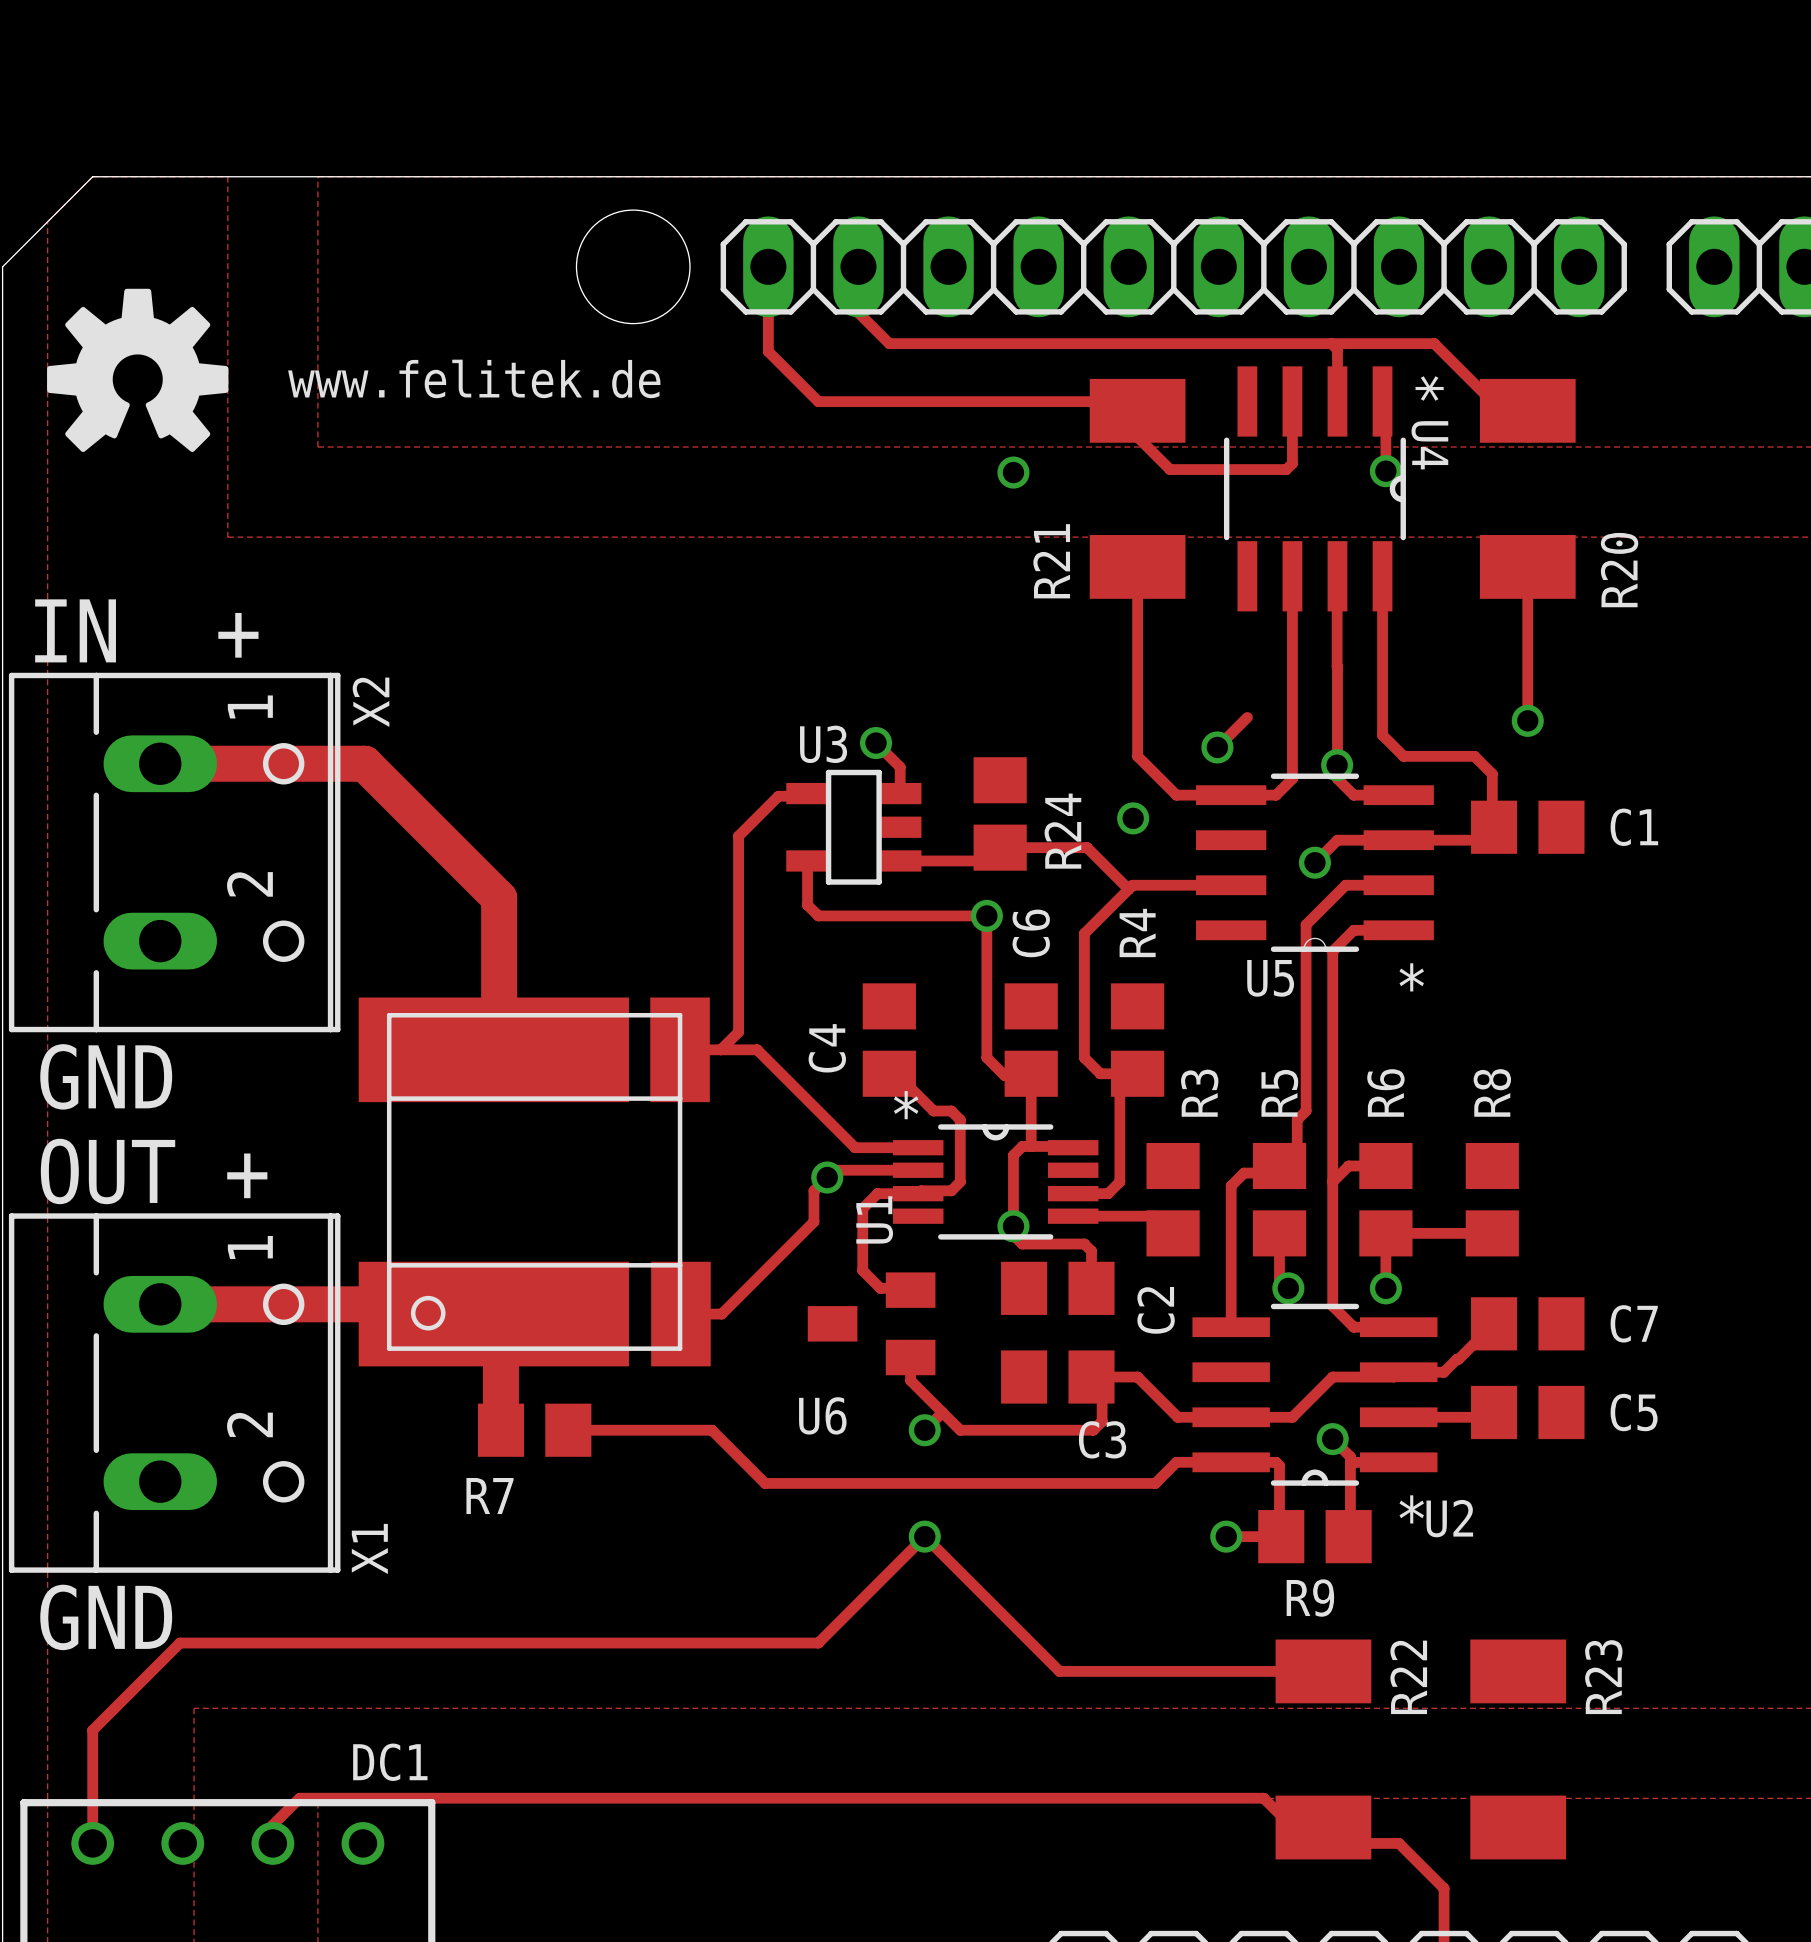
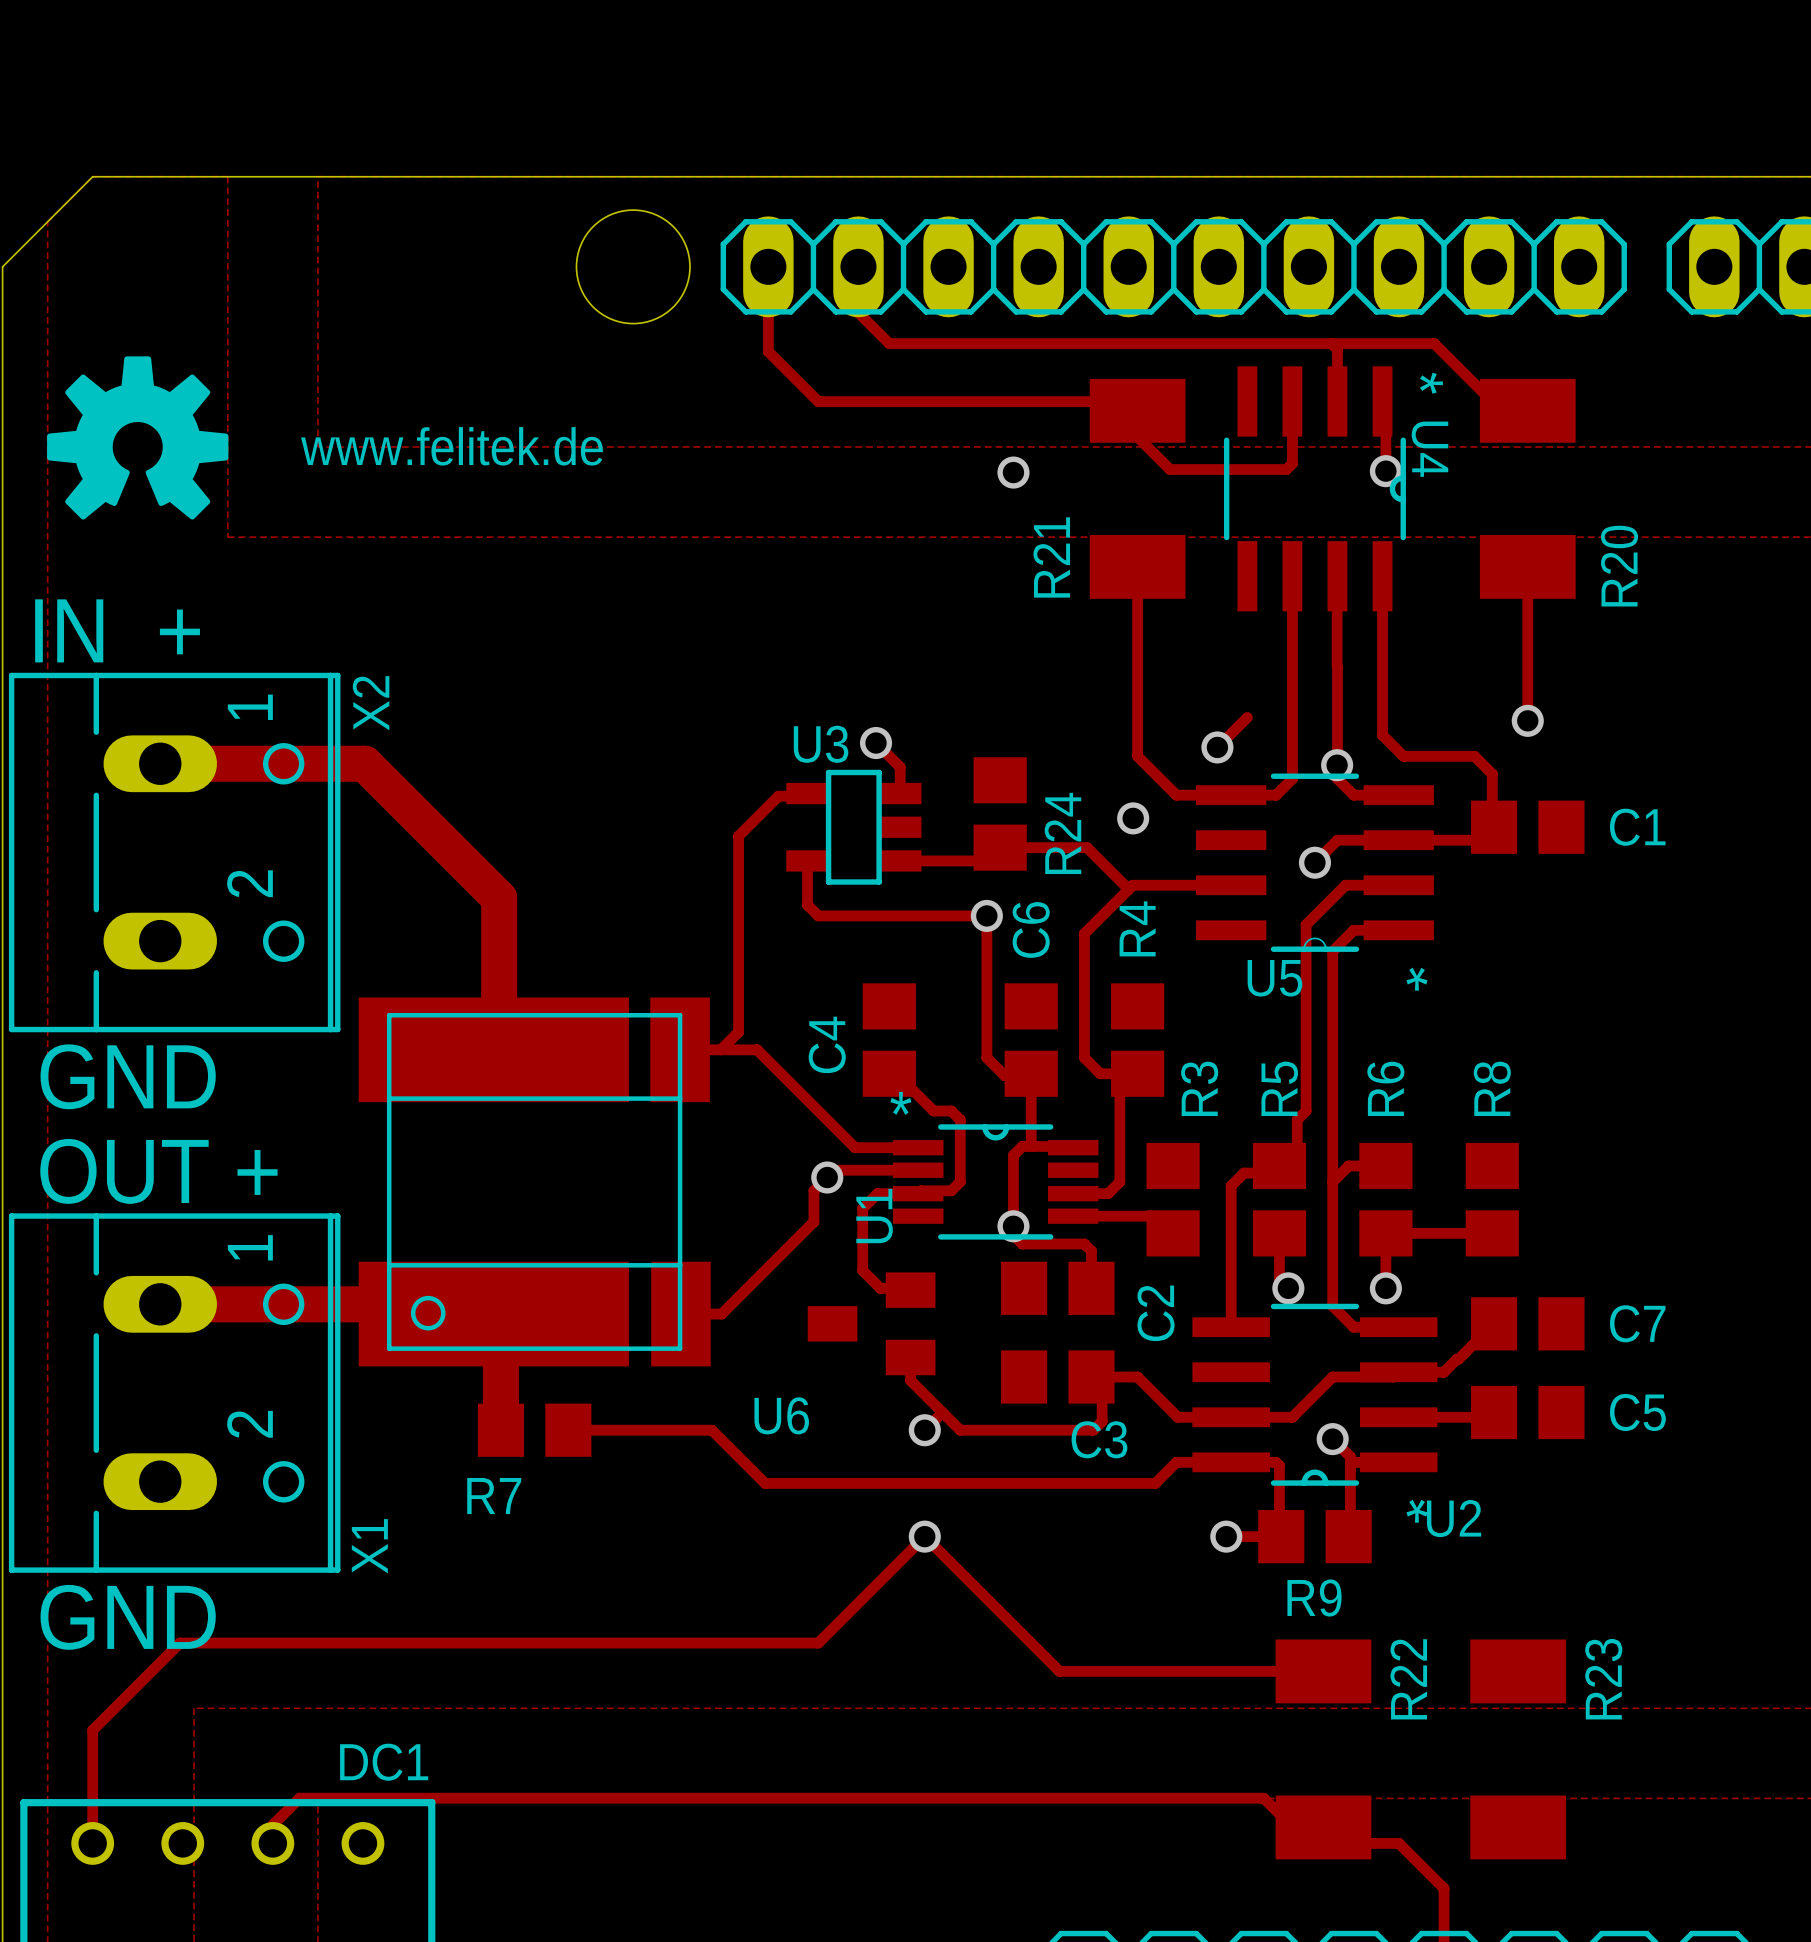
drawing position: (137, 370) -> (137, 437)
text position: www.felitek.de (474, 378) -> www.felitek.de (451, 446)
U6 name position: U6 (822, 1415) -> U6 (781, 1415)

